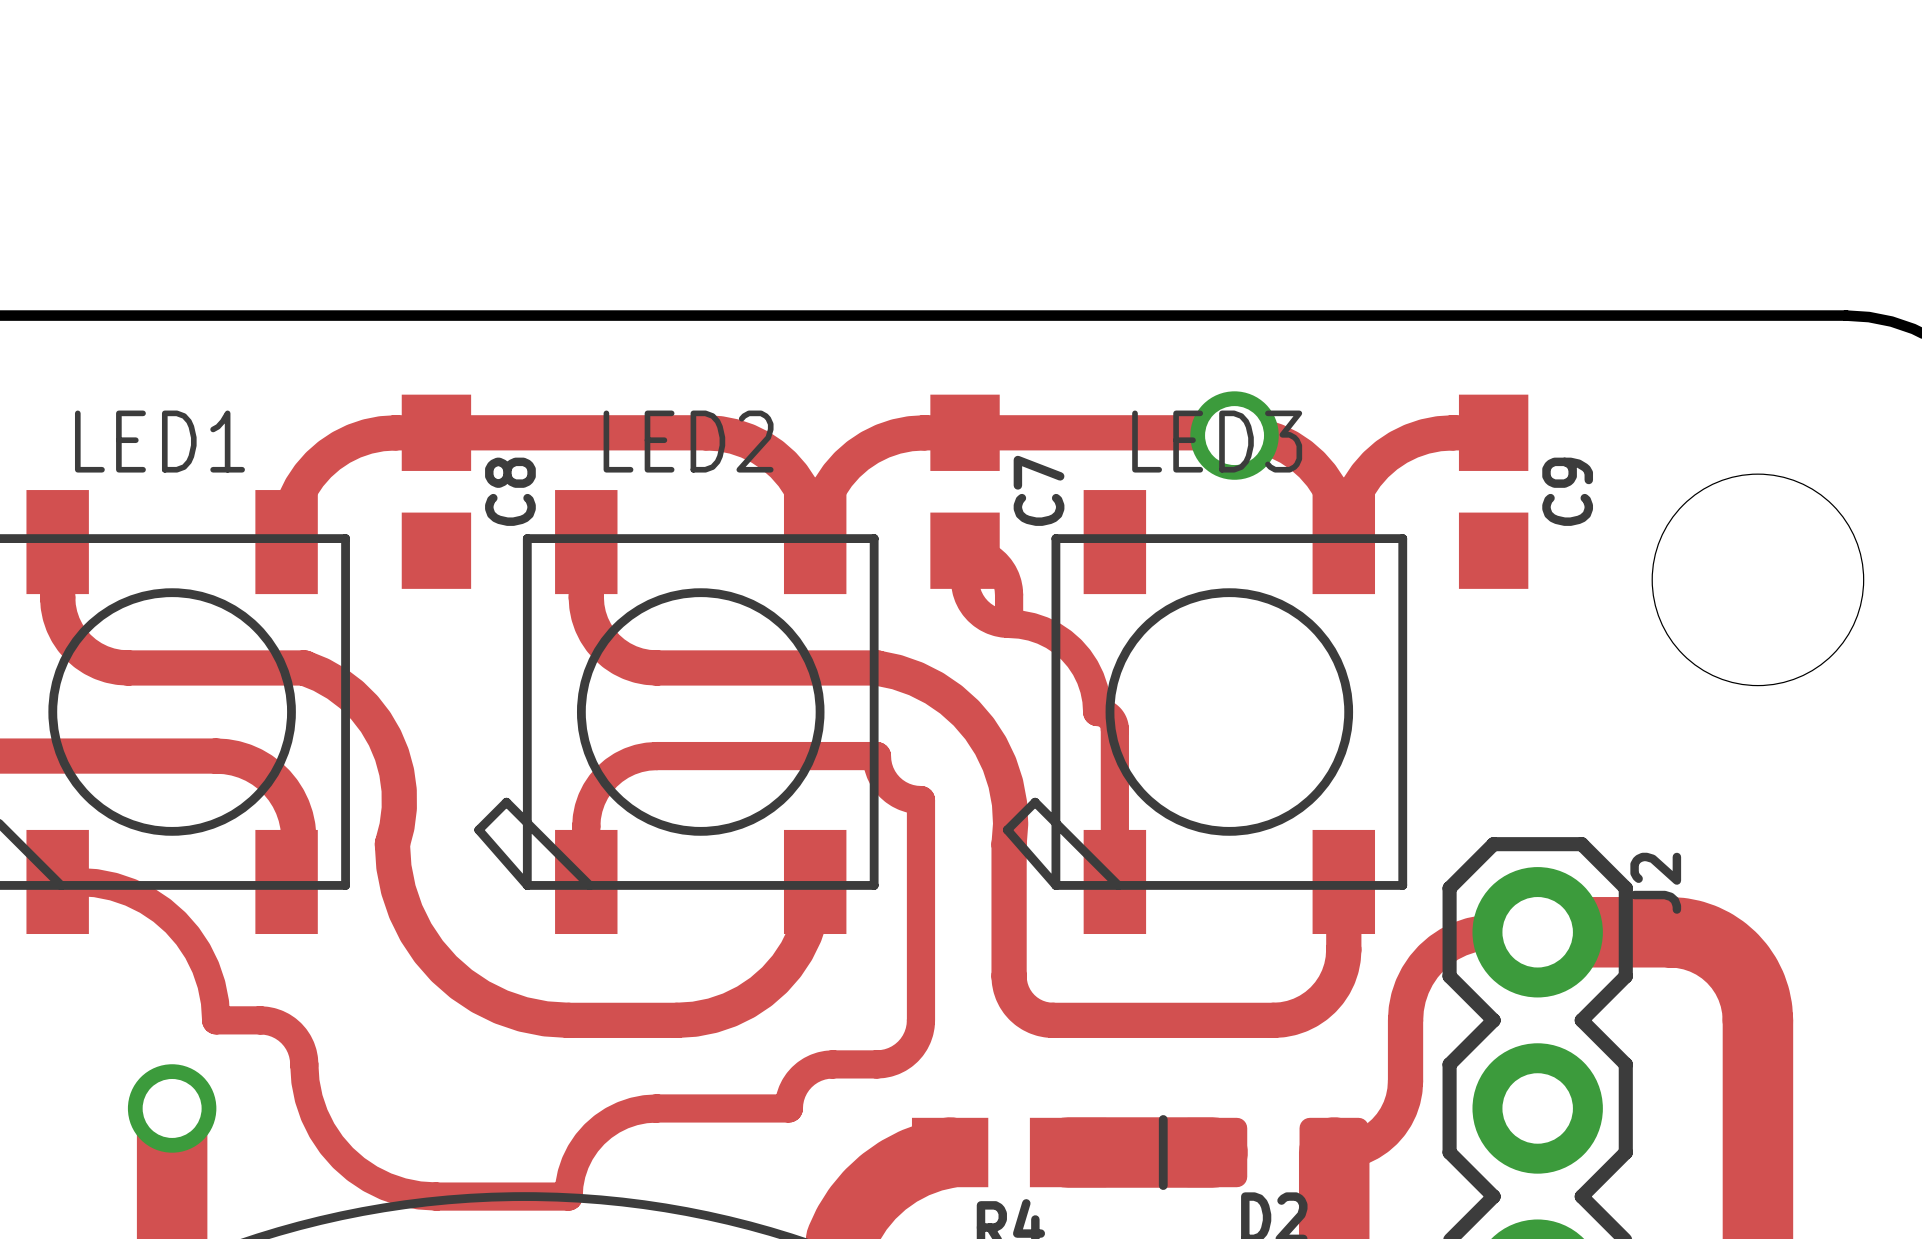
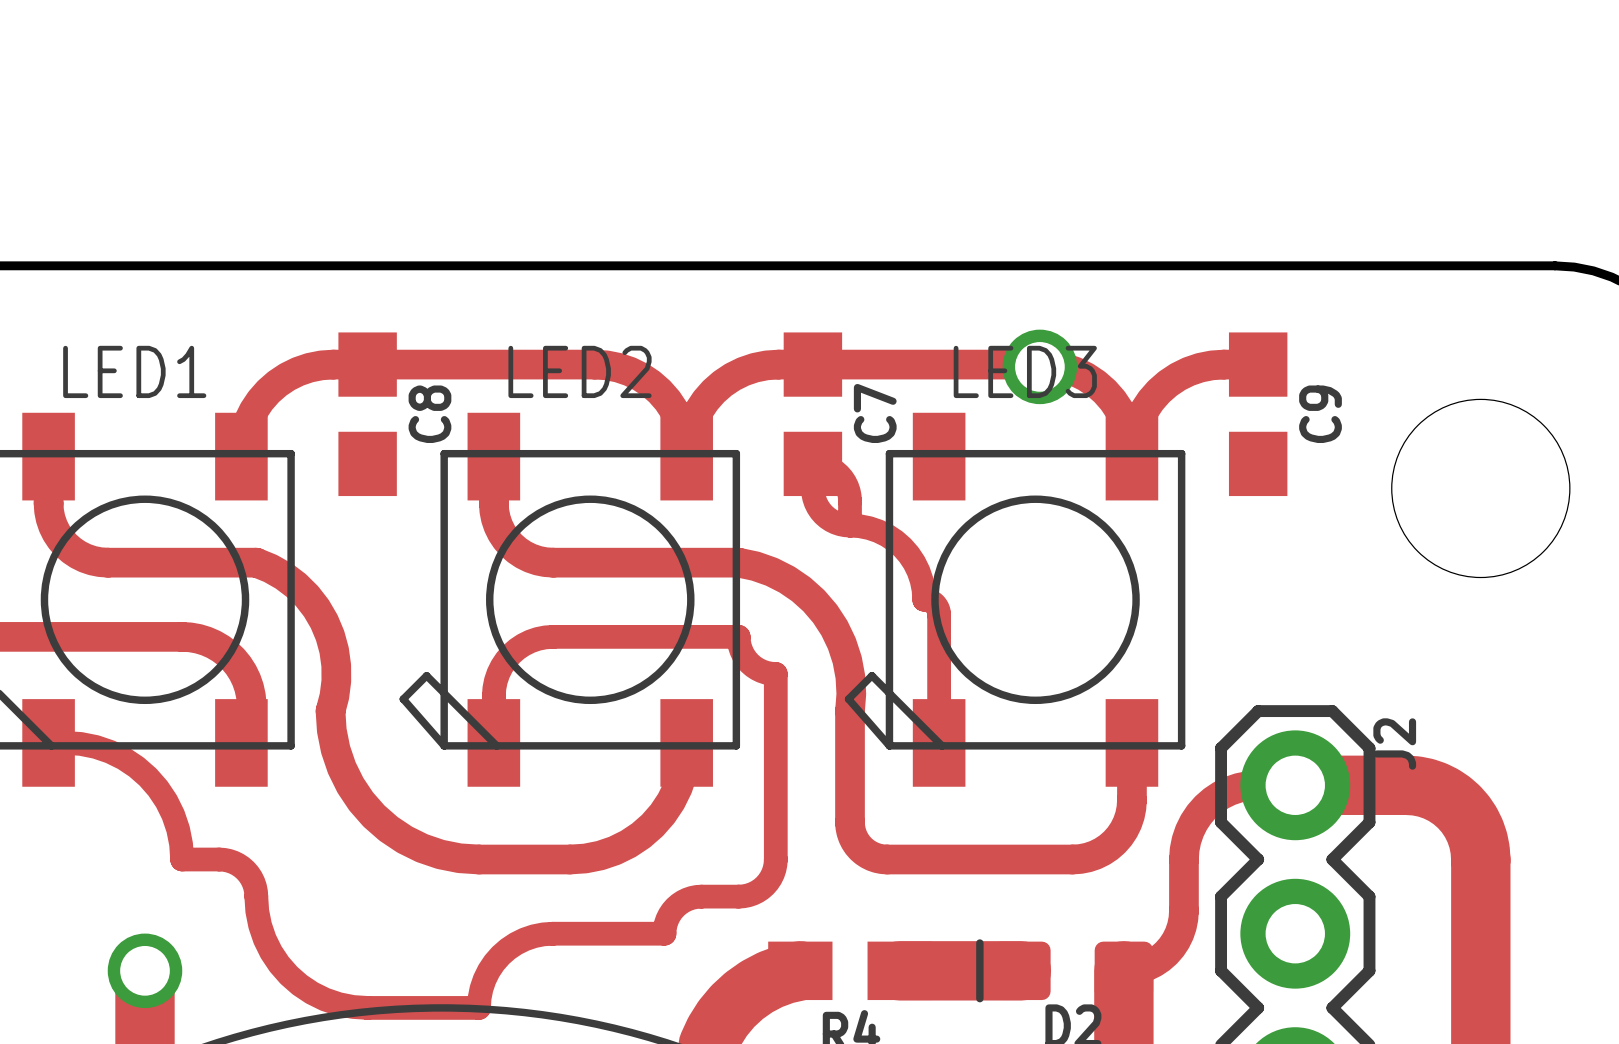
via position: (172, 1108) -> (145, 970)

